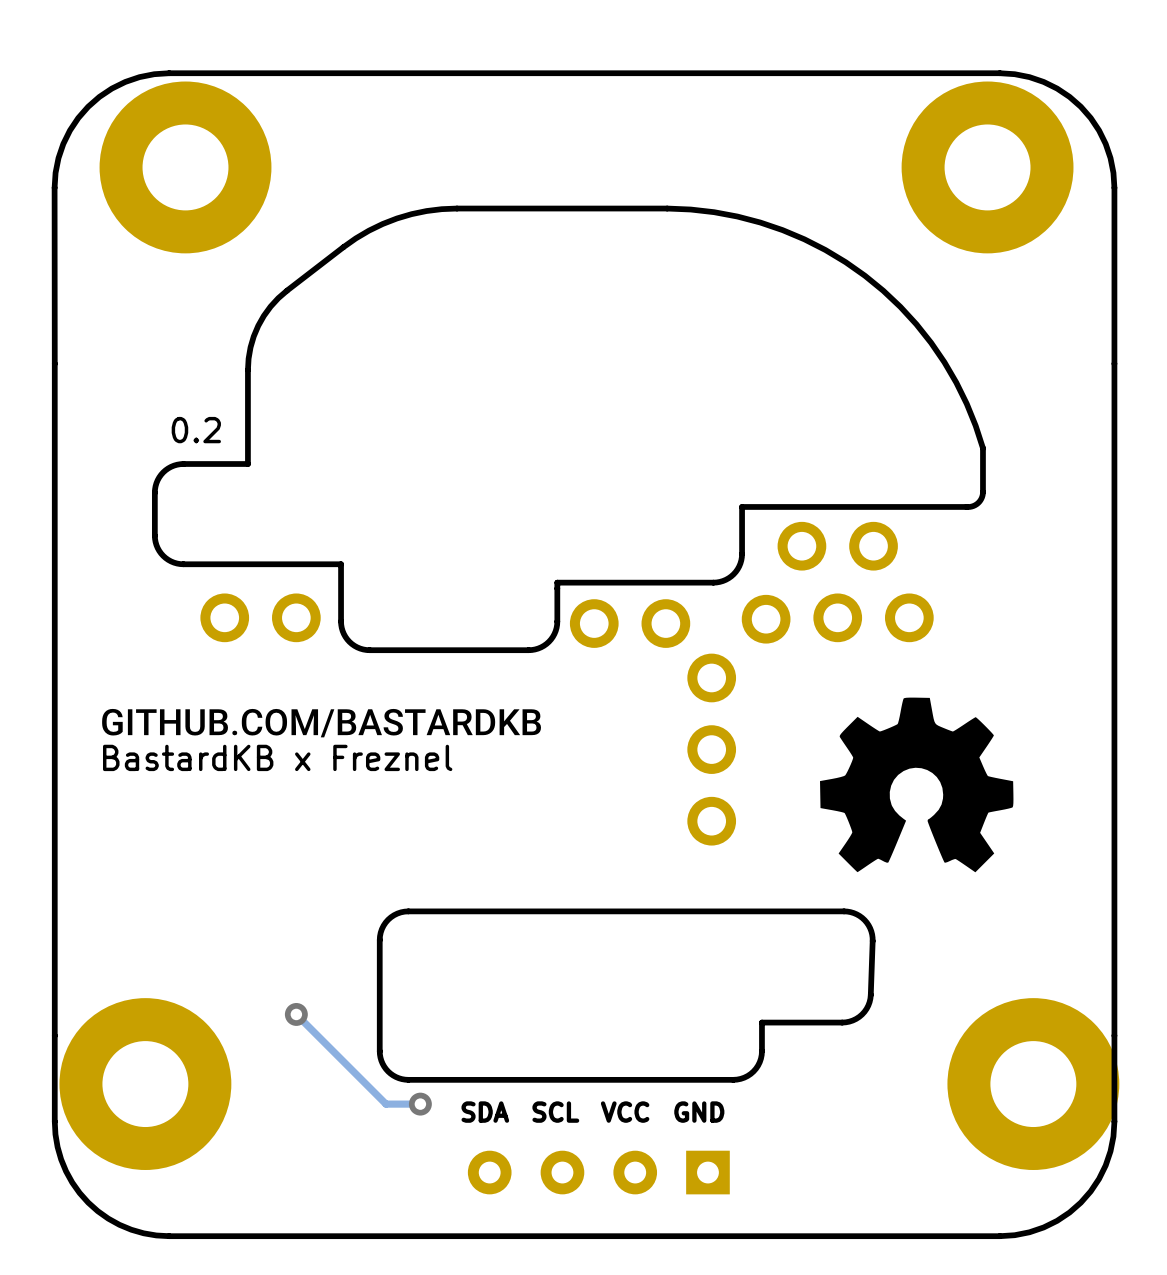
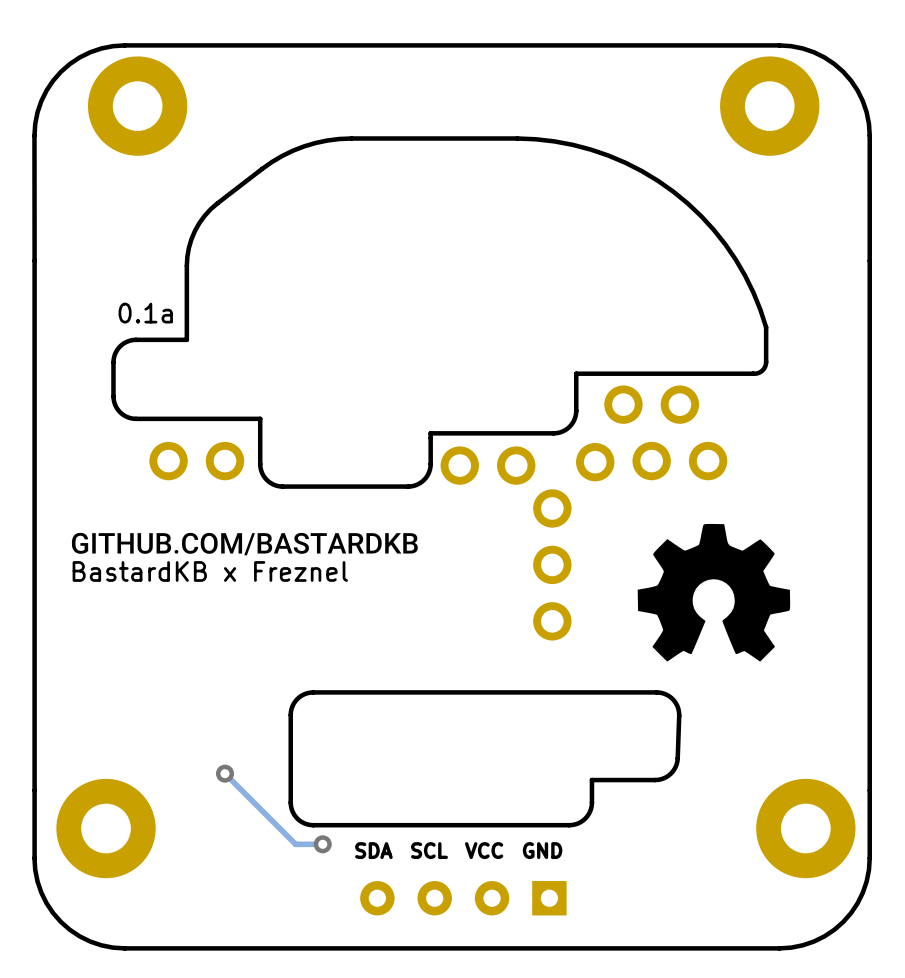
part footprint: [51, 70, 1118, 1240] -> [32, 43, 872, 951]
part footprint: [99, 81, 272, 254] -> [87, 56, 188, 156]
part footprint: [901, 81, 1074, 254] -> [720, 56, 820, 156]
text: 0.2 (196, 430) -> 0.1a (145, 313)
part footprint: [59, 998, 232, 1170] -> [56, 778, 156, 879]
part footprint: [947, 998, 1120, 1170] -> [756, 778, 856, 879]

